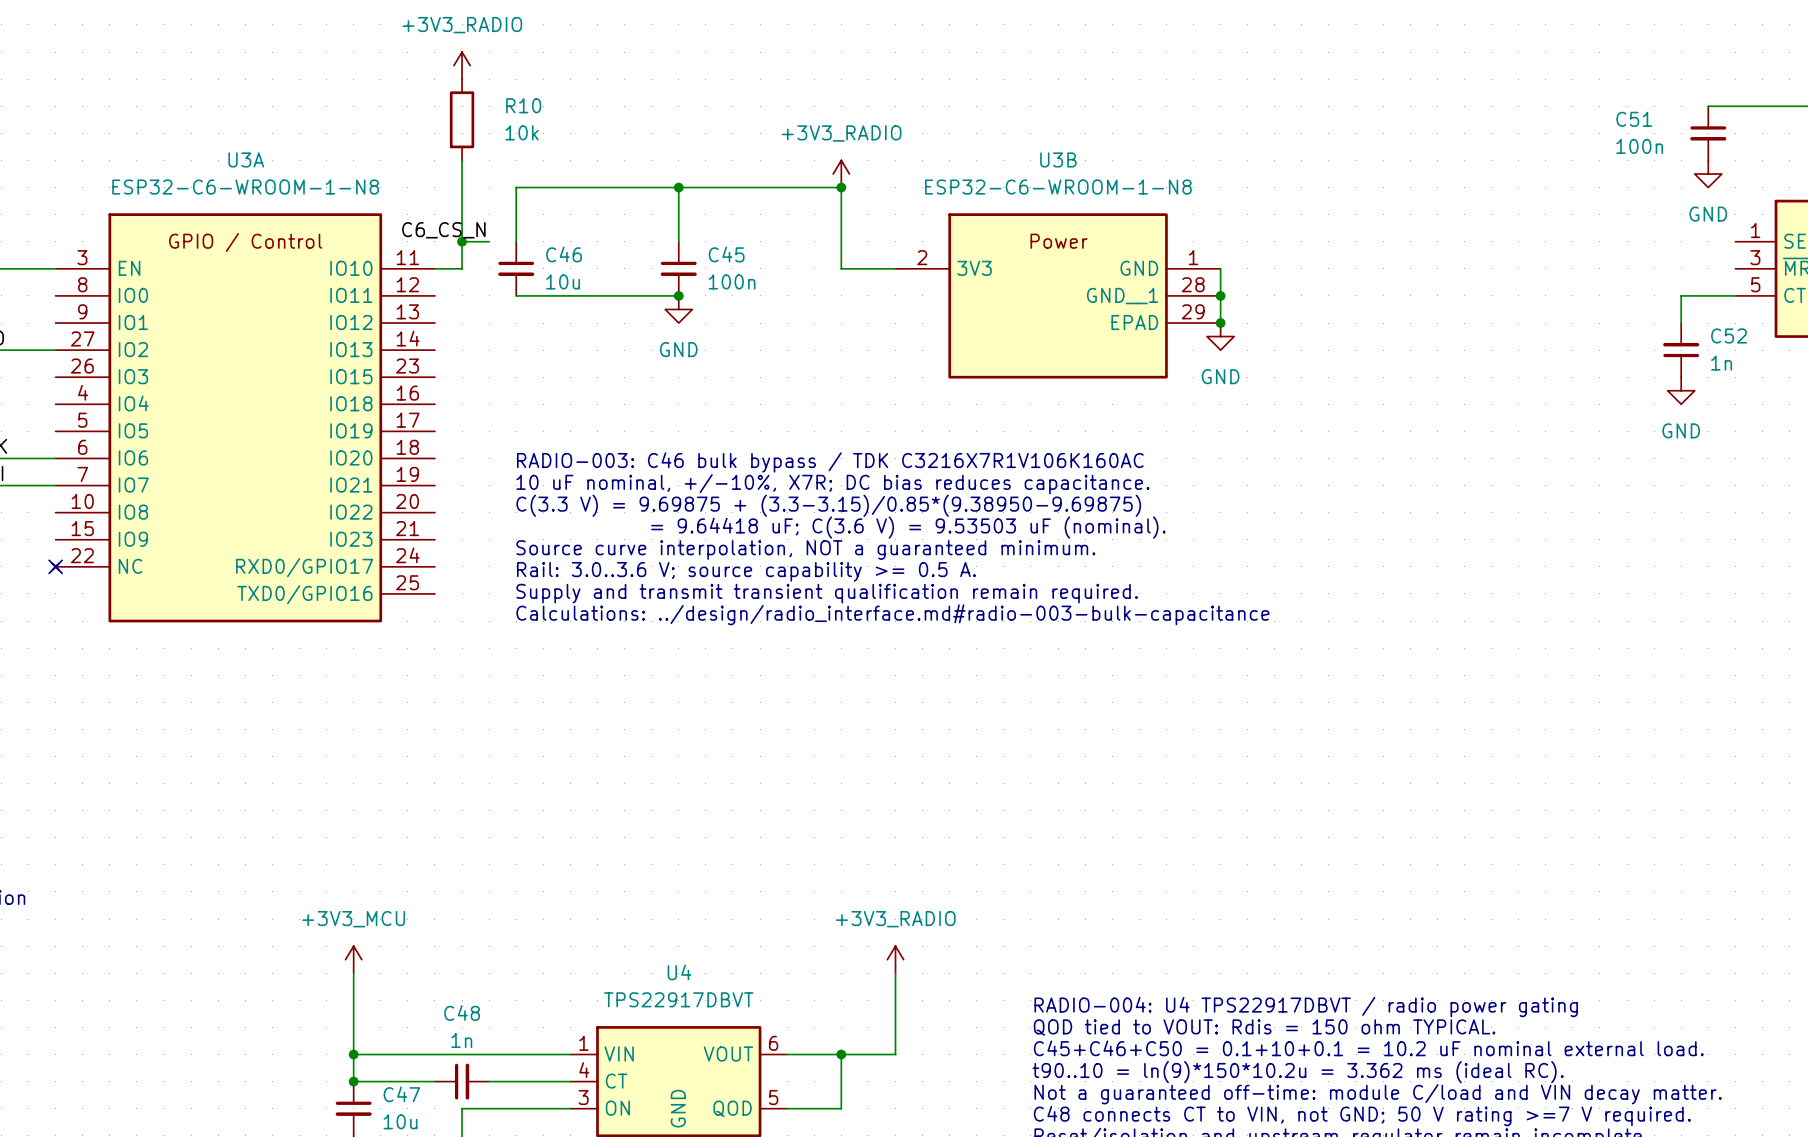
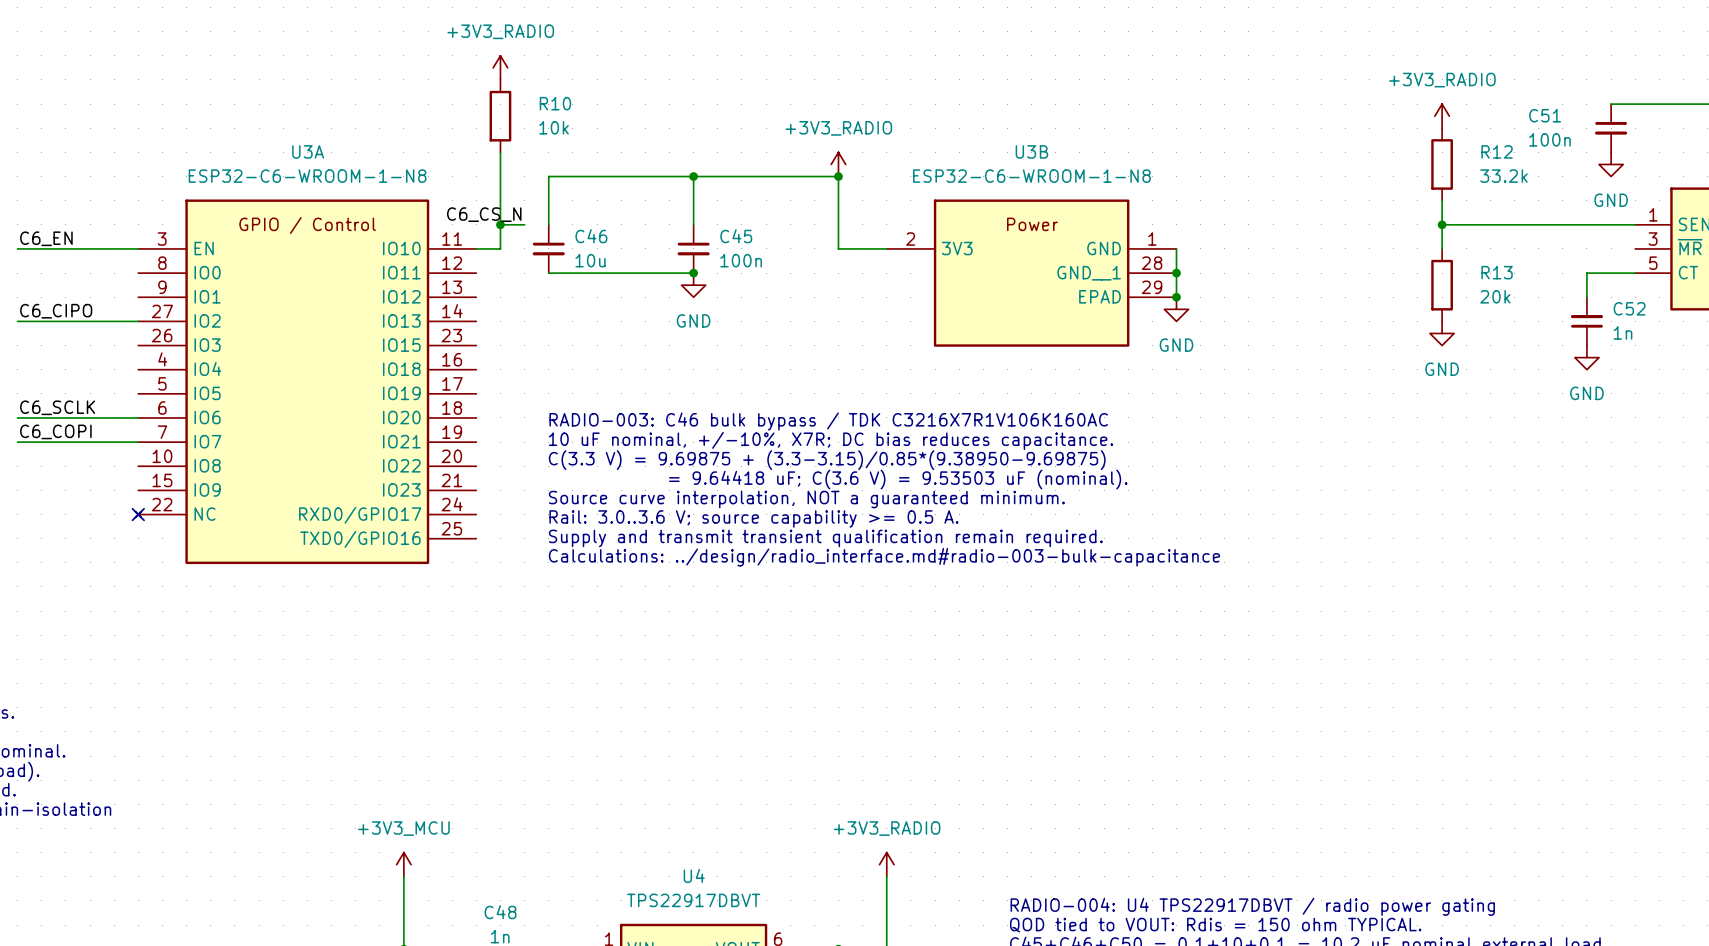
power symbol: none -> +3V3_RADIO (1442, 116)
R12: none -> 33.2k (1442, 164)
wire: none -> (1442, 200) (1442, 248)
wire: none -> (1442, 224) (1635, 224)
junction: none -> (1442, 224)
R13: none -> 20k (1442, 285)
power symbol: none -> GND (1442, 333)

